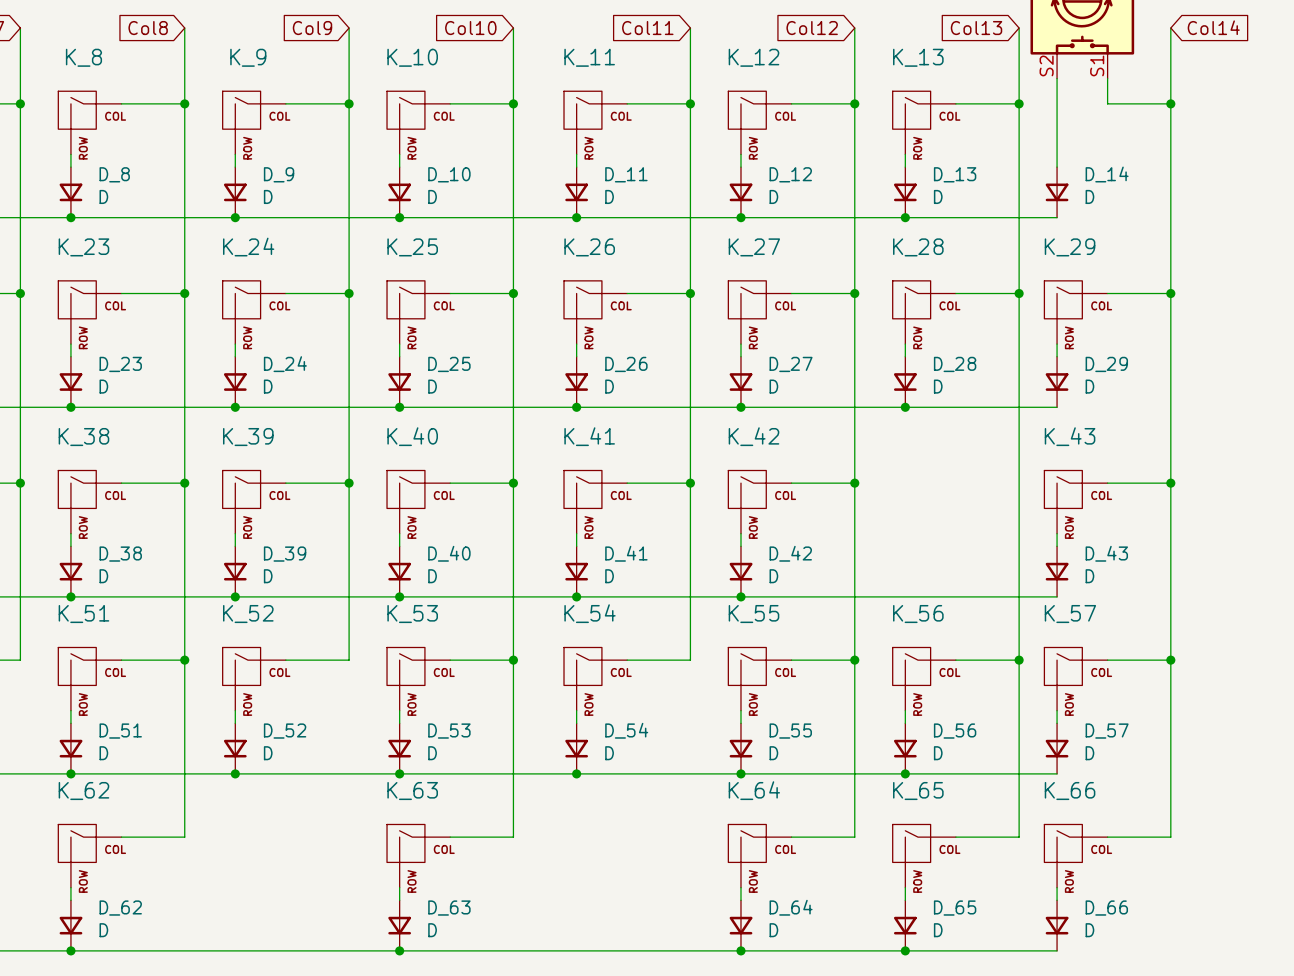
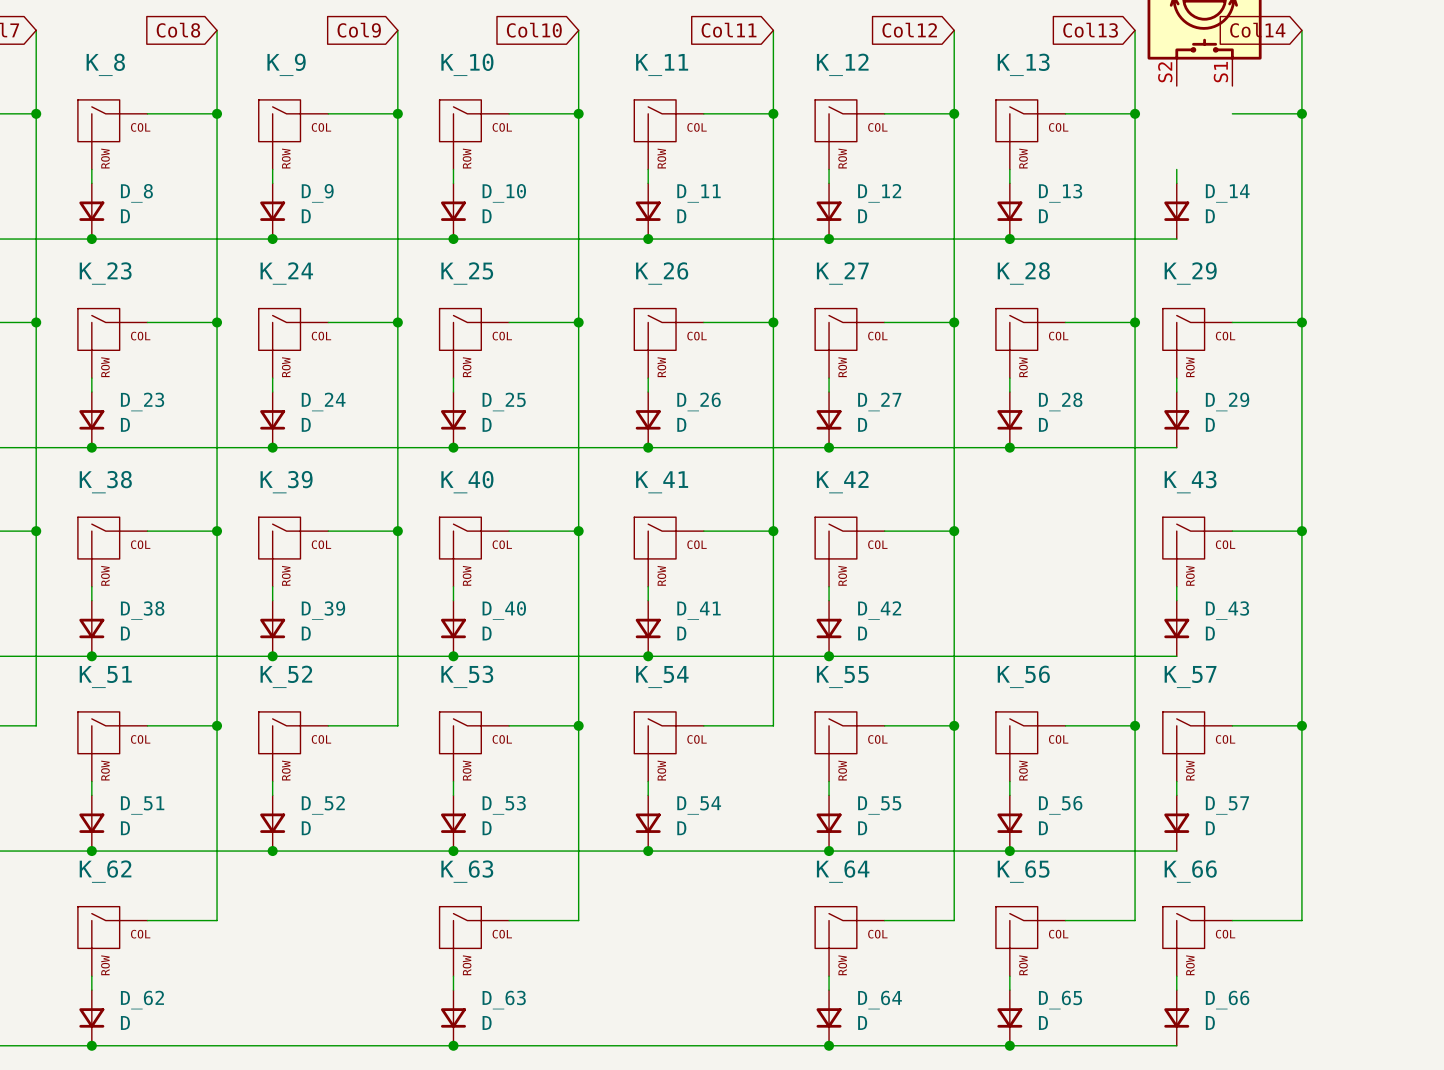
global label rotation: 0° (1213, 27) -> 180° (1257, 30)
global label position: Col14 (1213, 27) -> Col14 (1257, 30)
wire: (1057, 78) (1057, 154) -> none
wire: (1107, 78) (1107, 103) -> none

